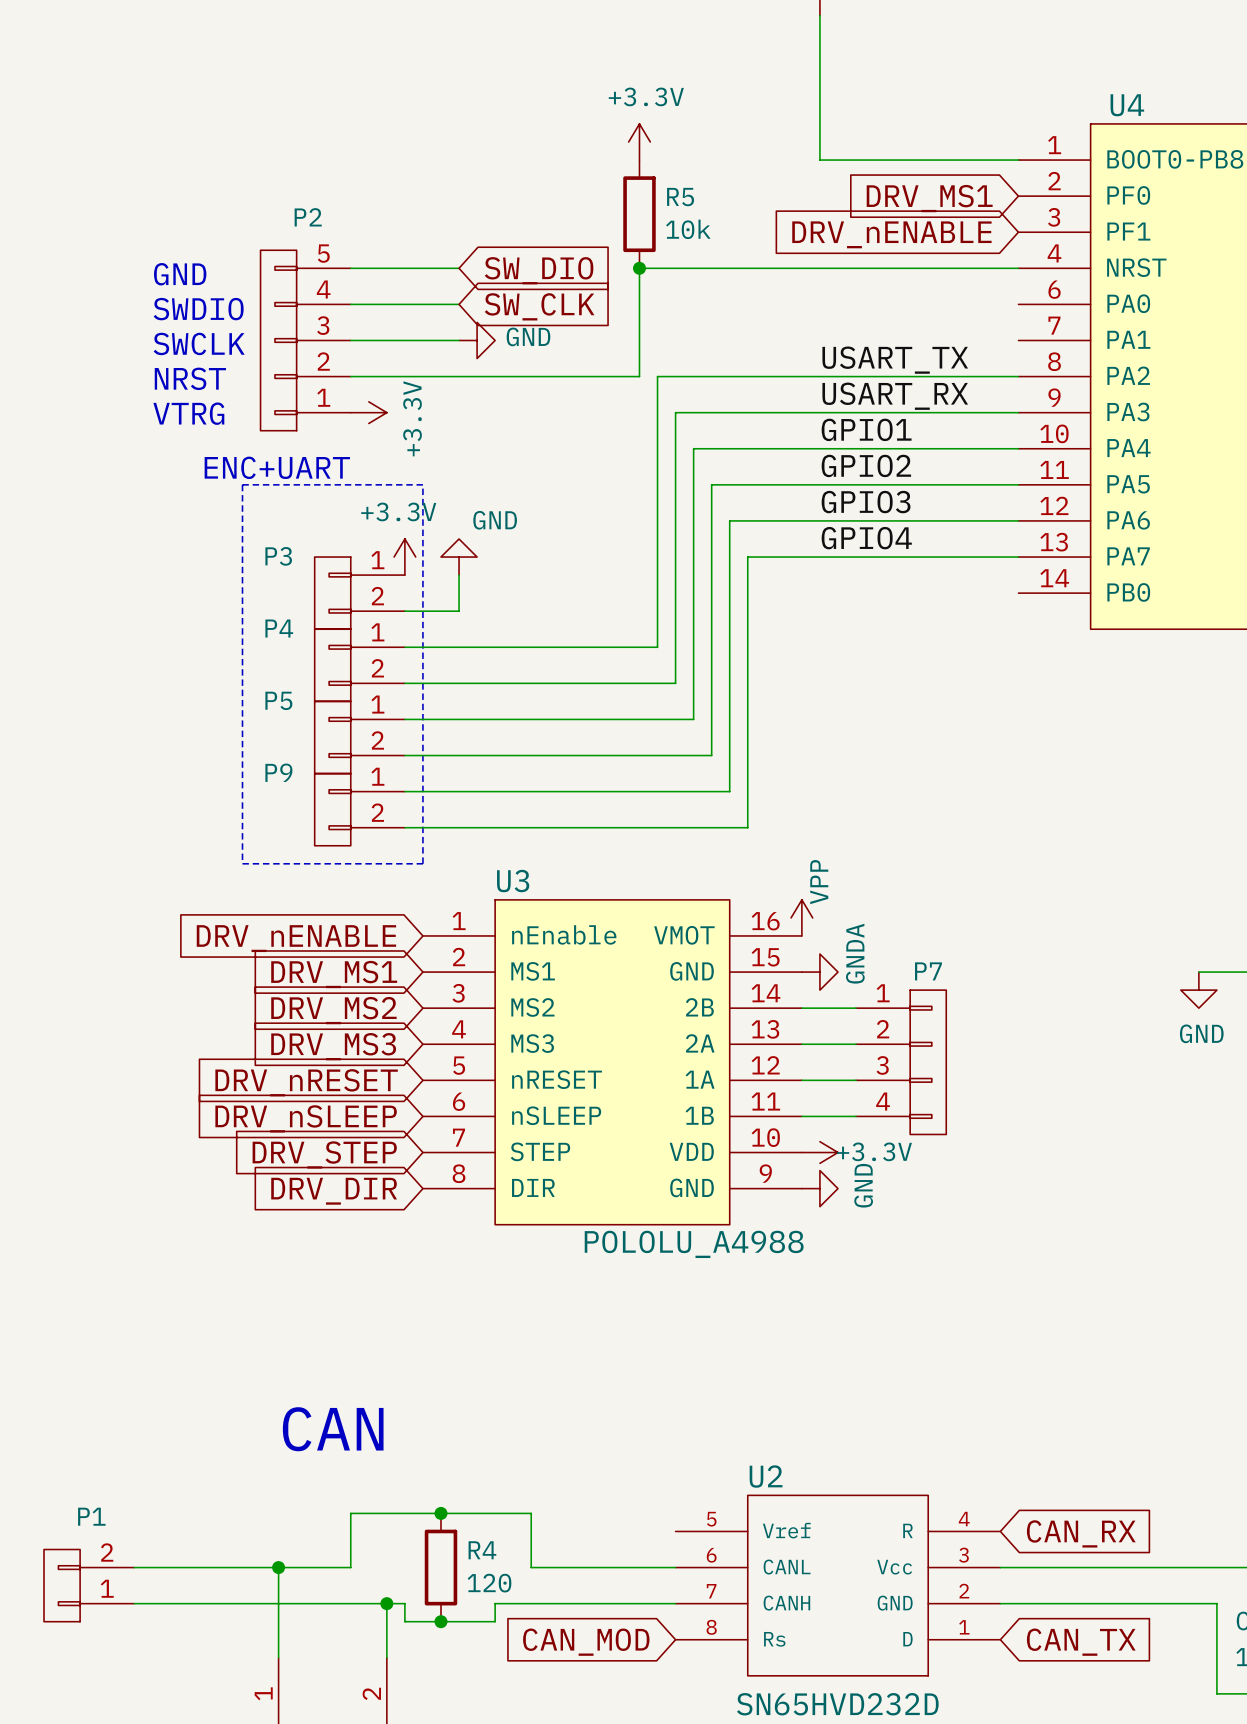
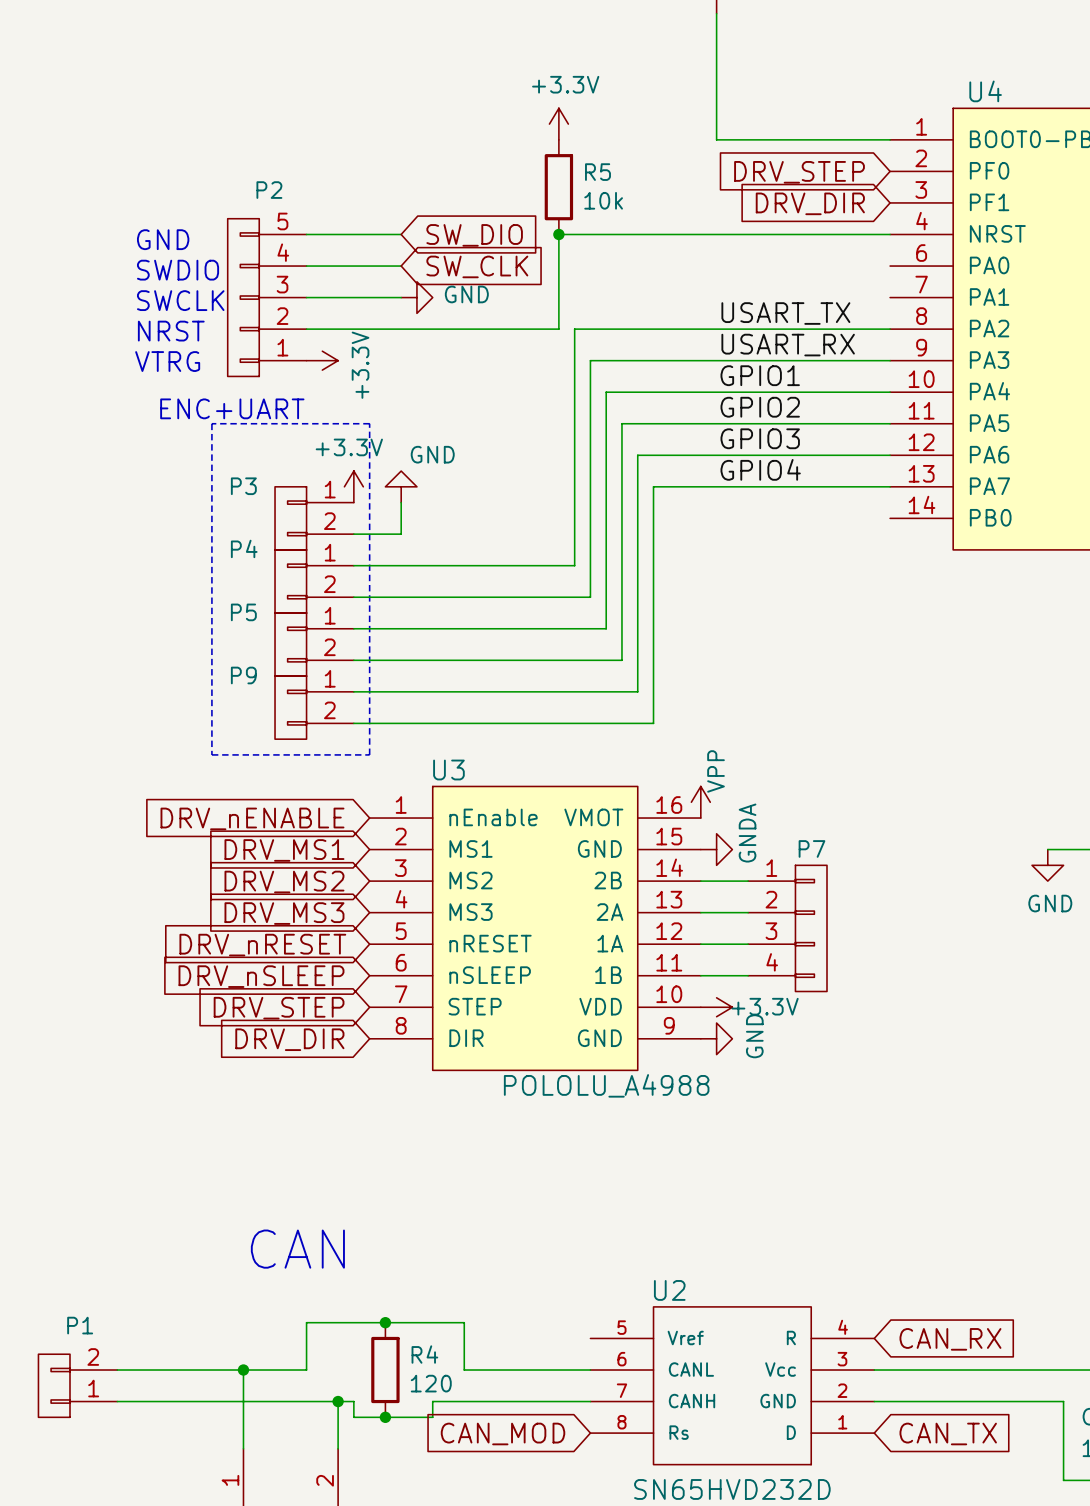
global label: DRV_MS1 (929, 198) -> DRV_STEP (799, 172)
global label: DRV_nENABLE (891, 234) -> DRV_DIR (810, 203)

